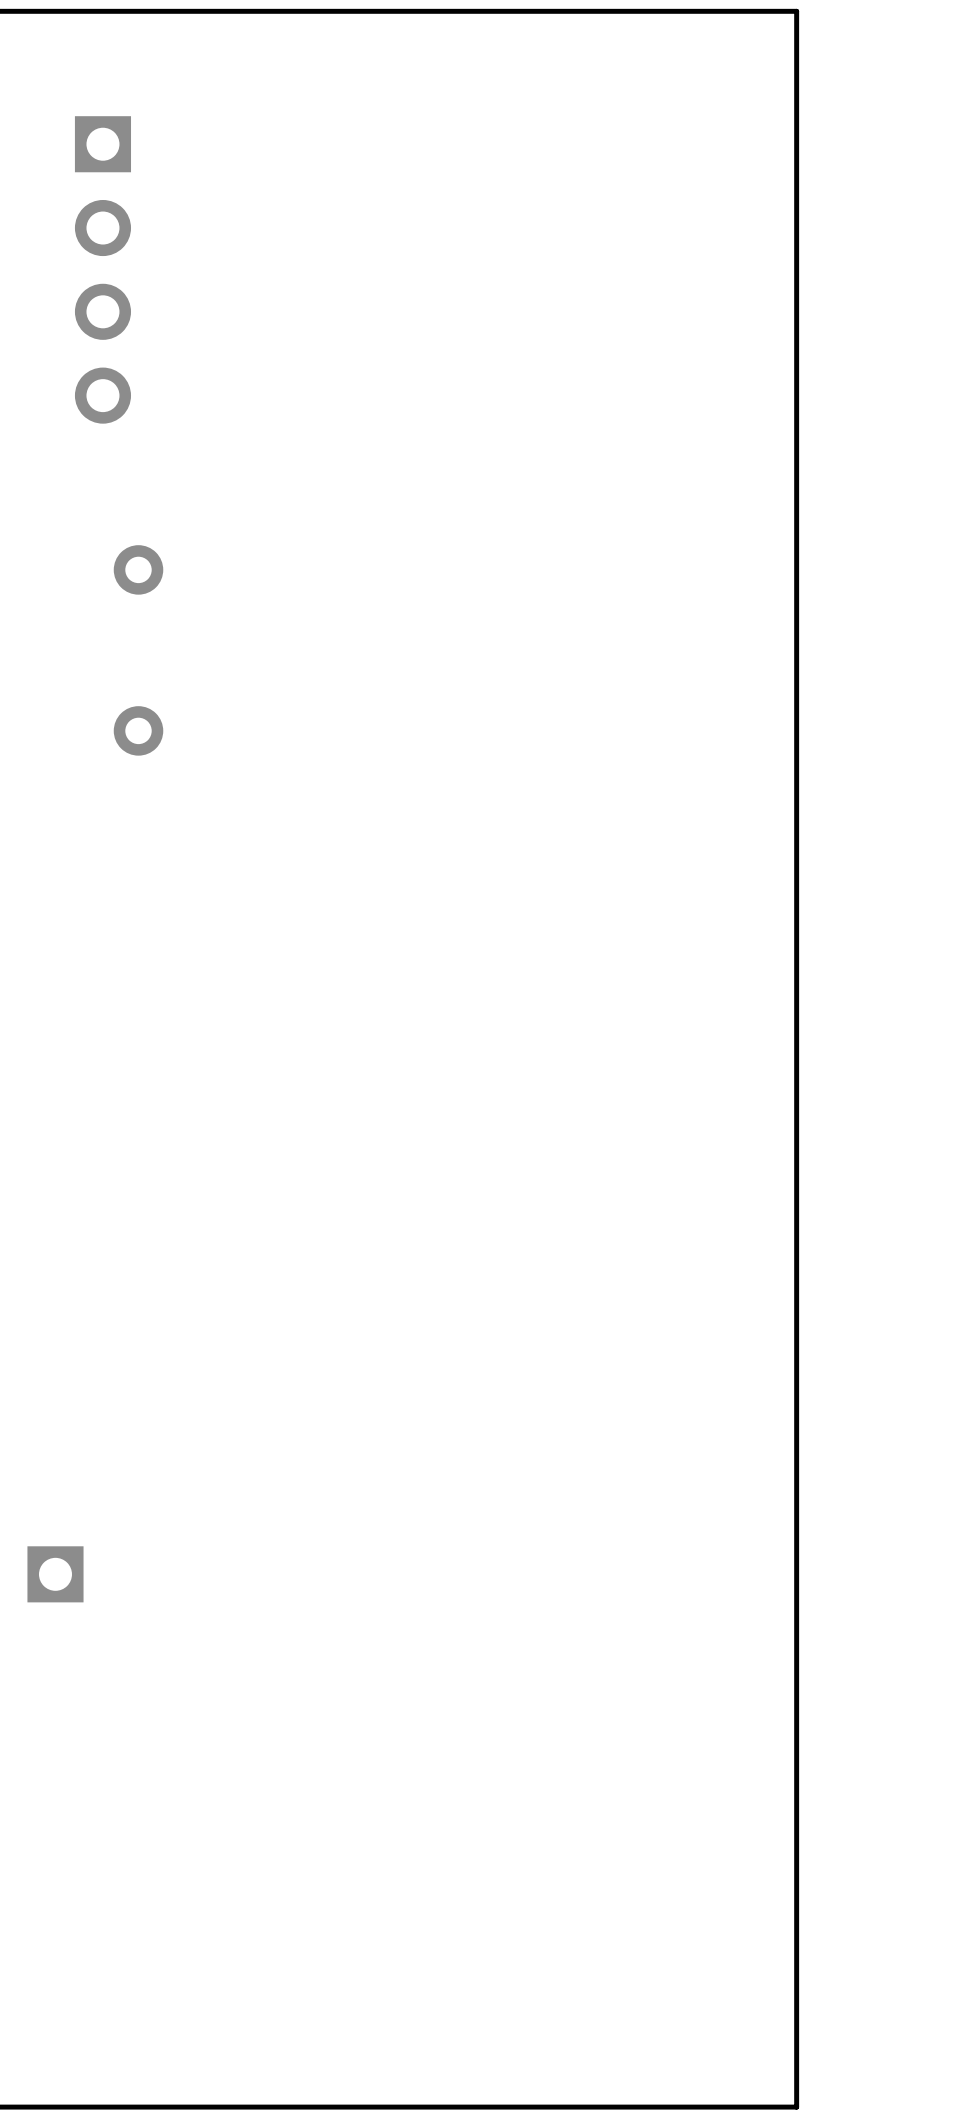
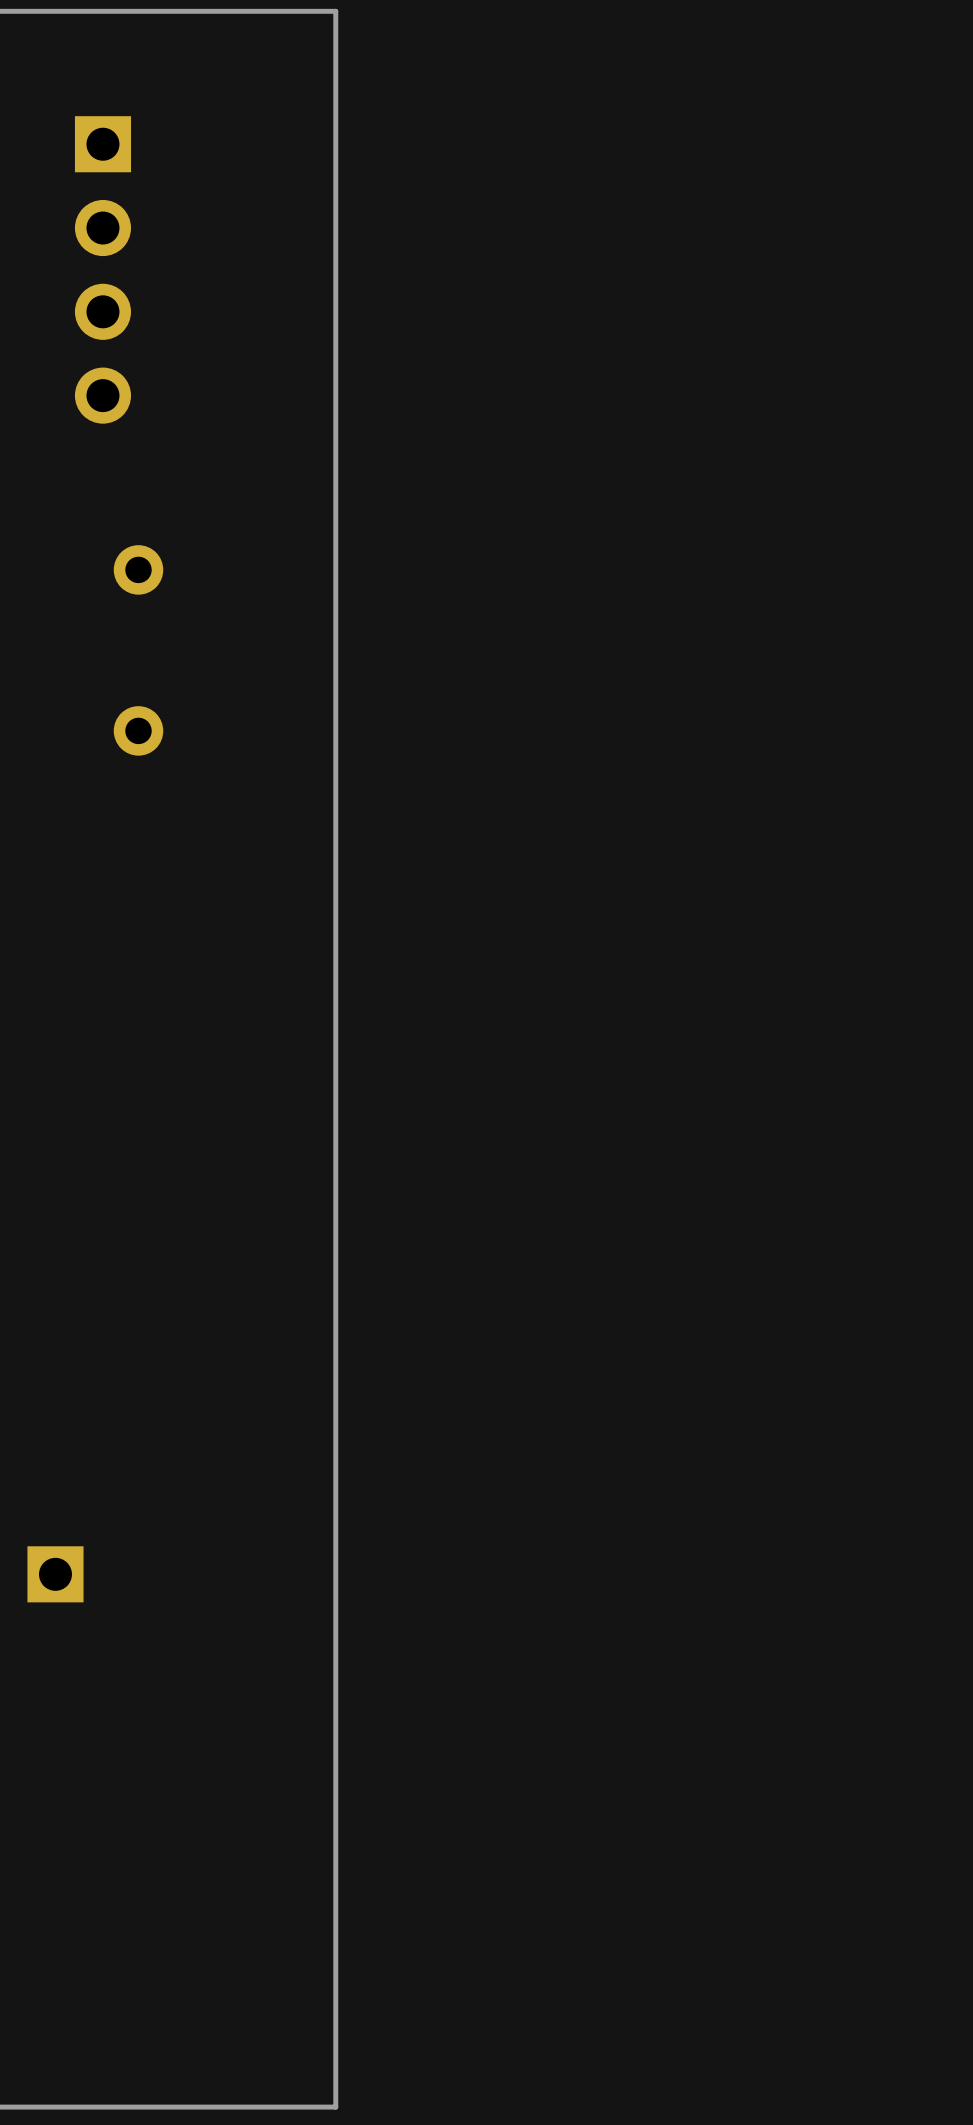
board edge: (335, 11) (796, 11) (796, 2107) (335, 2107) -> (335, 11) (335, 2107)

